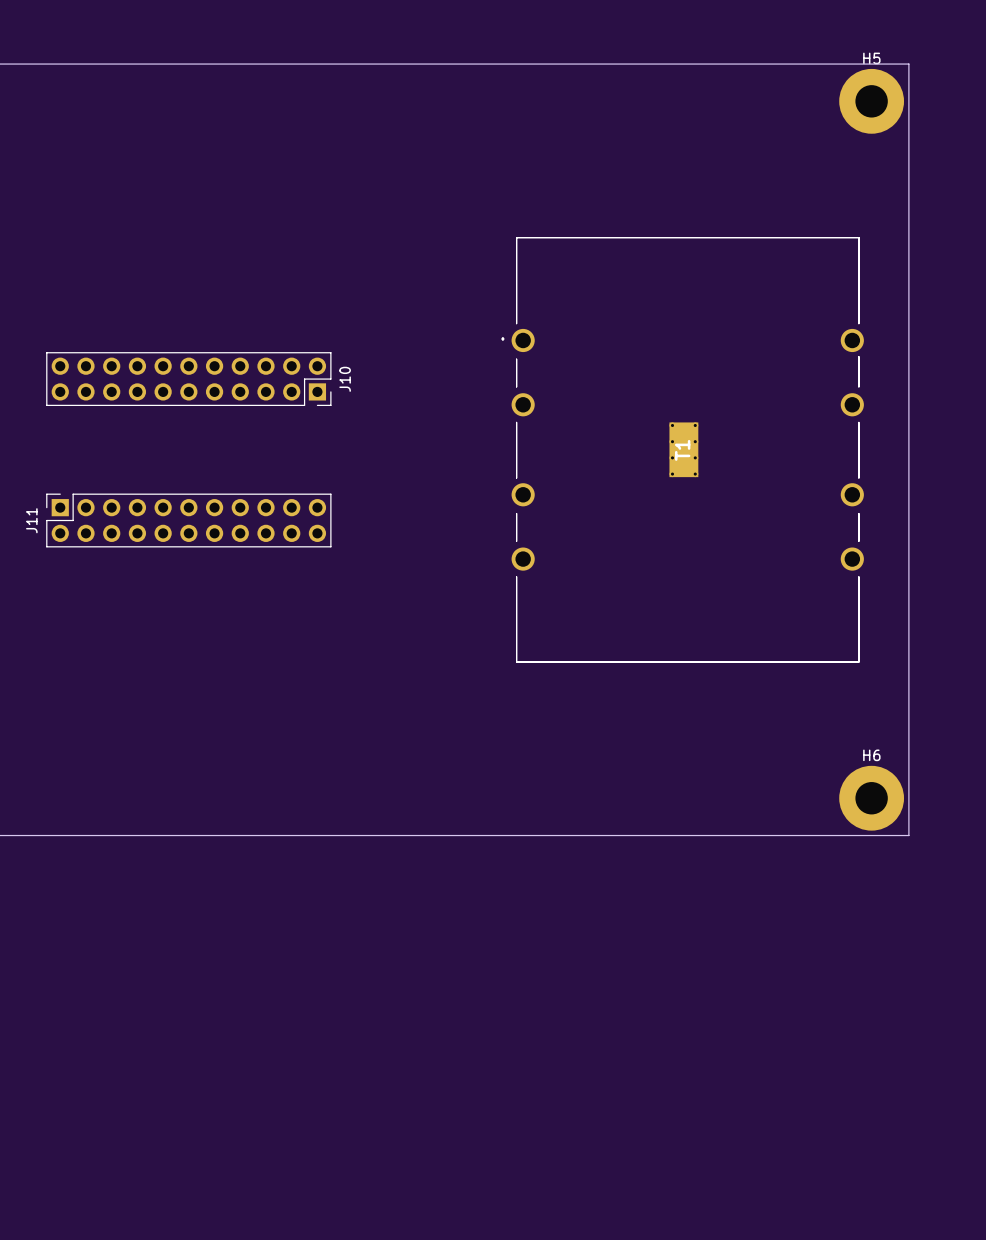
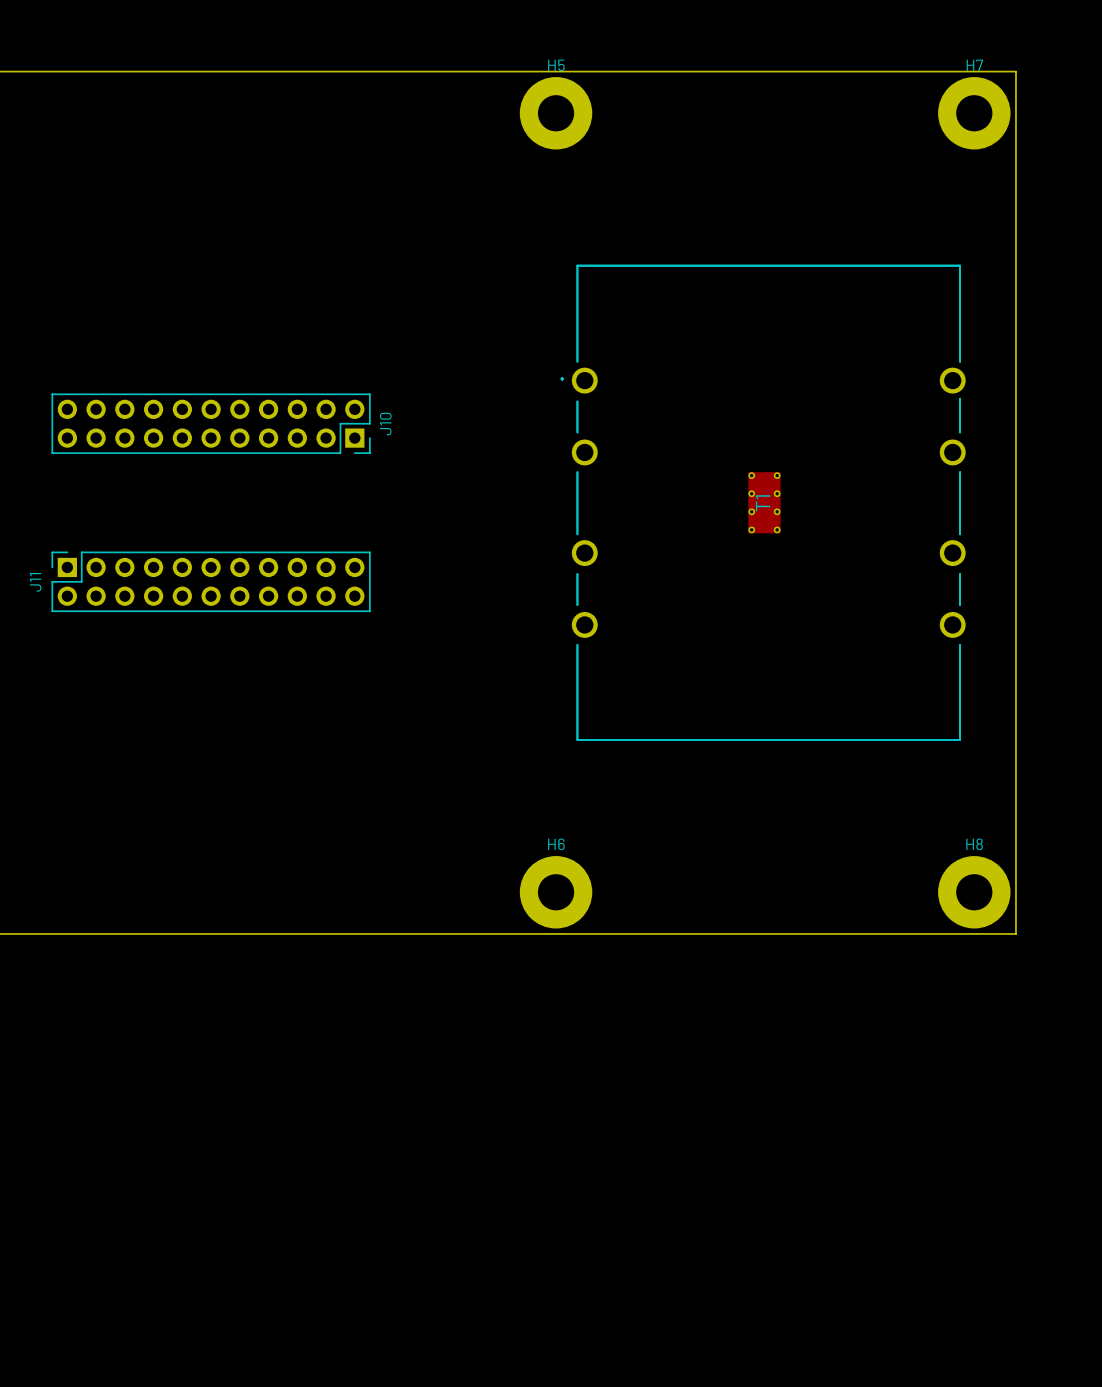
H5 name: H5 (871, 58) -> H7 (974, 65)
H5: none -> (556, 113)
H6 name: H6 (871, 755) -> H8 (974, 844)
H6: none -> (556, 892)

